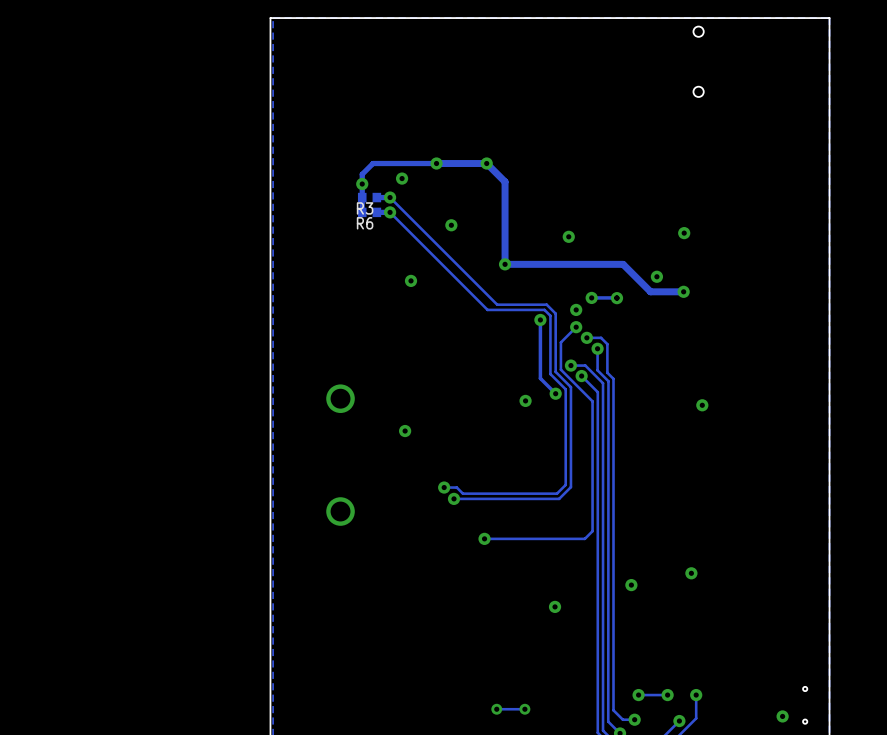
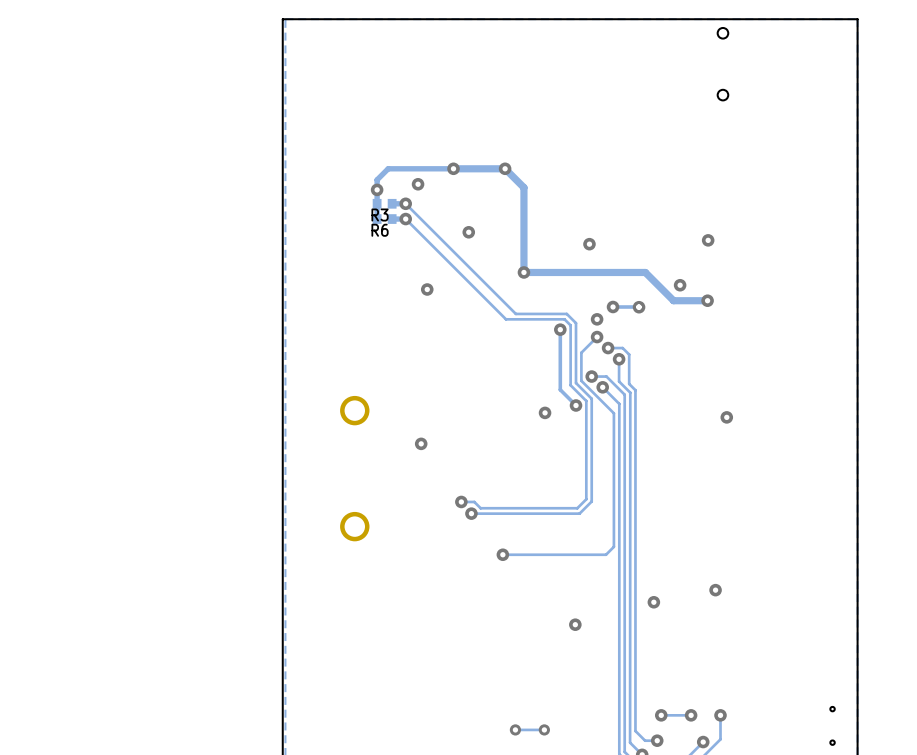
via: (782, 716) -> none

